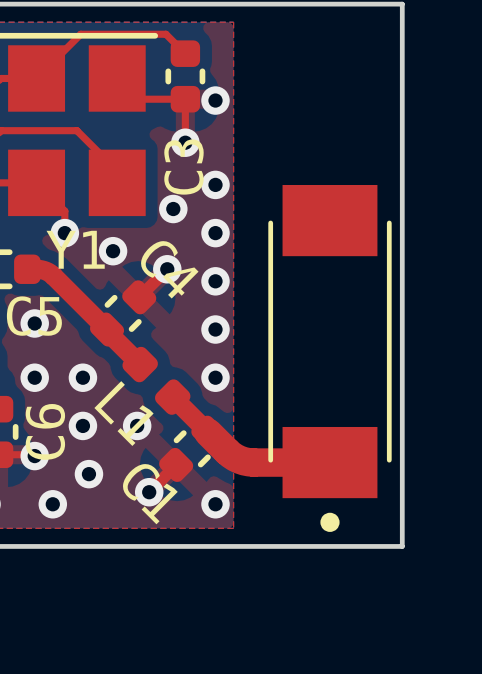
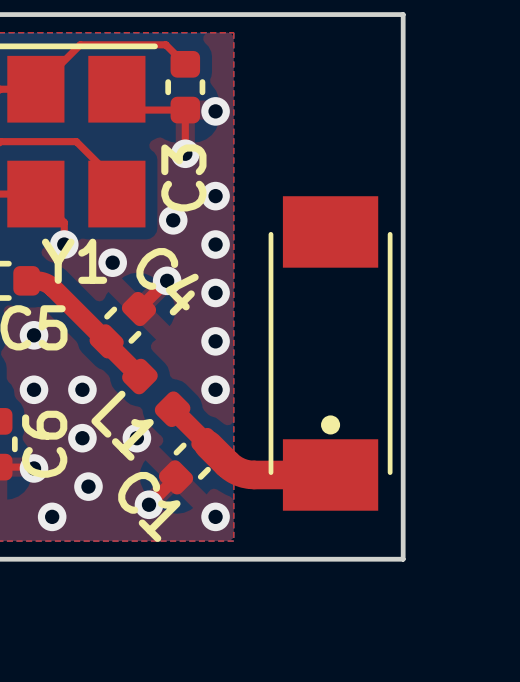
part footprint: [268, 185, 392, 499] -> [268, 196, 393, 511]
drawing: [320, 512, 340, 532] -> none

